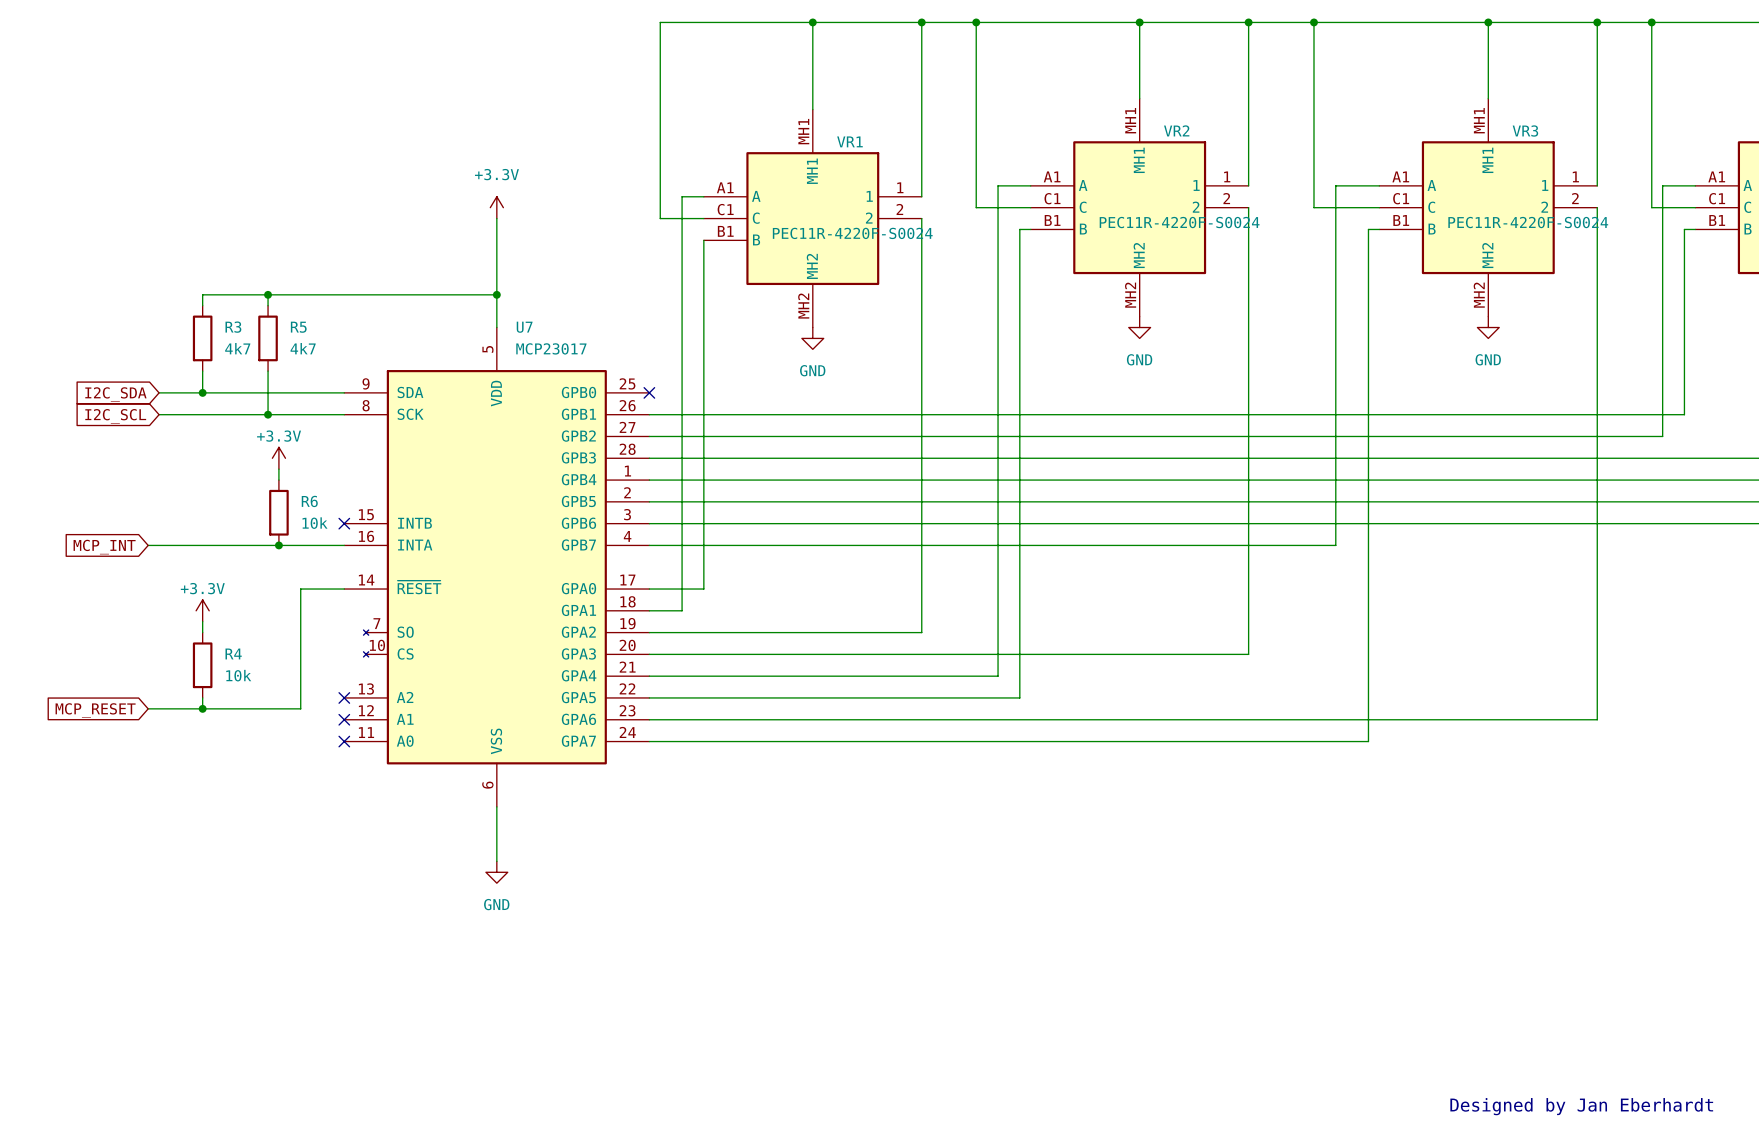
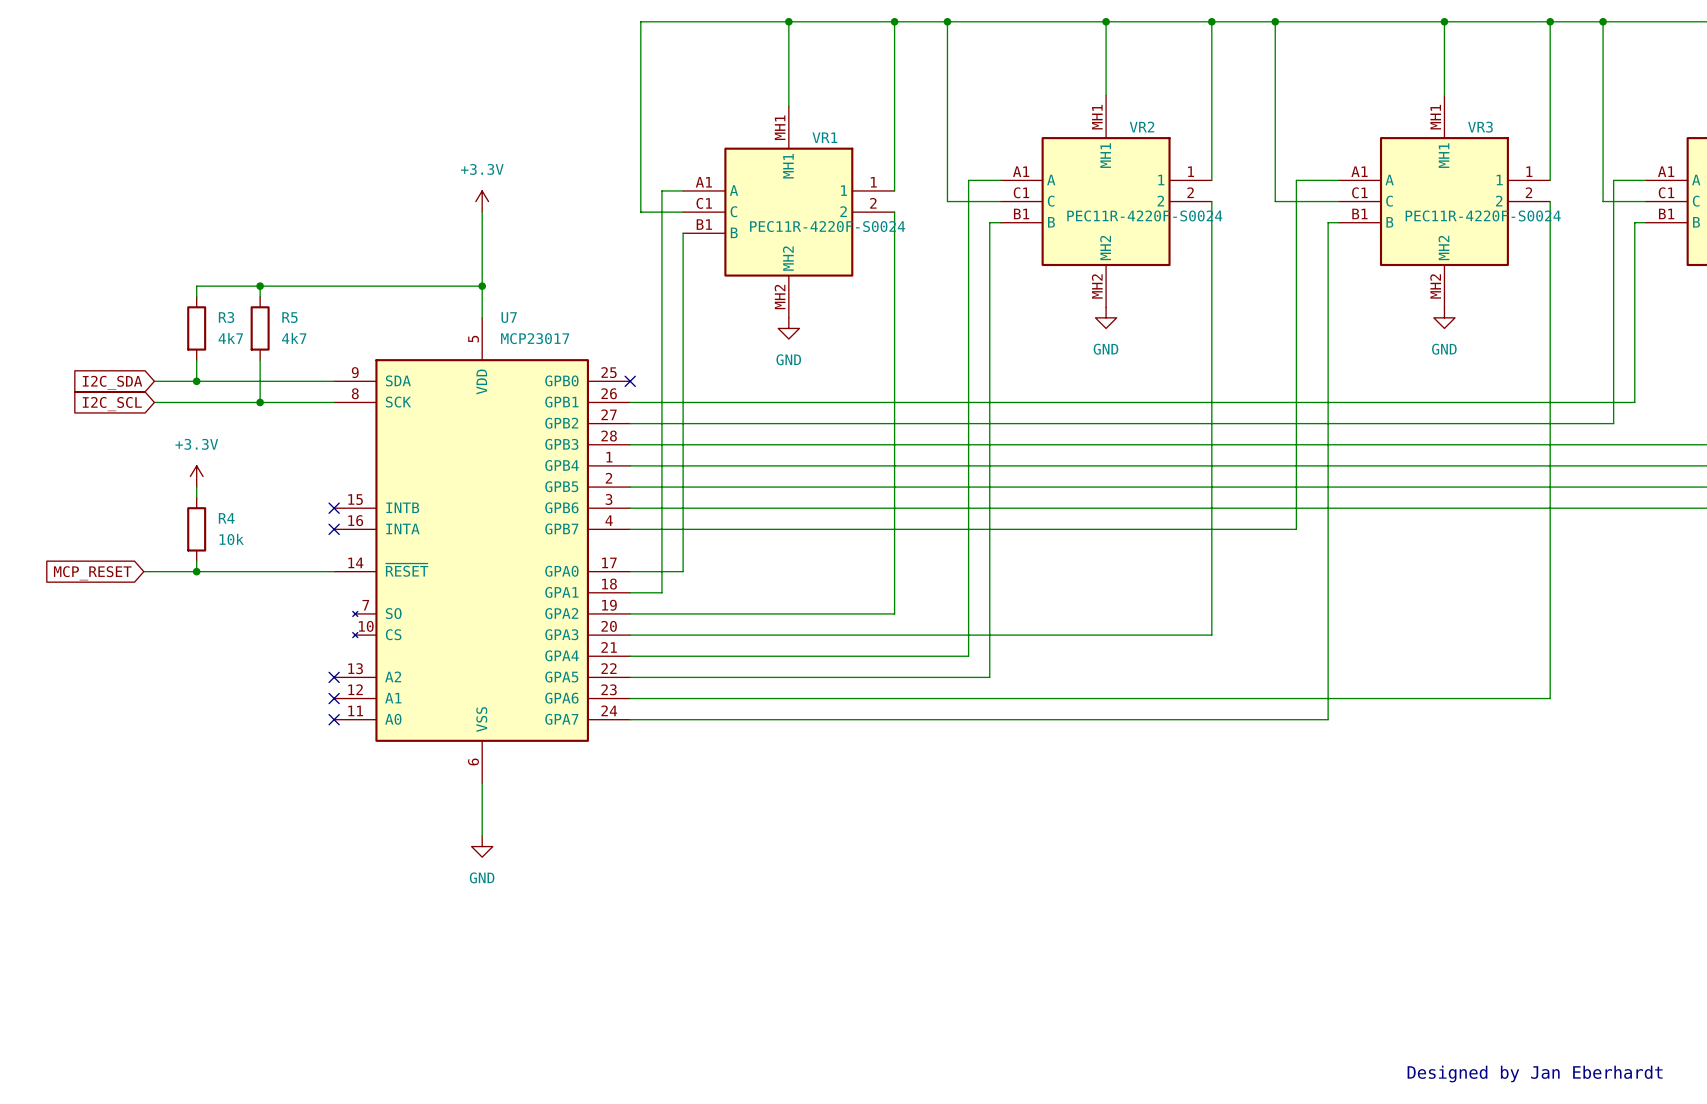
power symbol: +3.3V (278, 458) -> none
wire: (278, 469) (278, 480) -> none
power symbol: none -> +3.3V (196, 476)
R6: 10k (278, 512) -> none
wire: (148, 545) (344, 545) -> none
junction: (278, 545) -> none
no-connect mark: none -> (334, 529)
global label: MCP_INT (104, 547) -> none
junction: none -> (196, 571)
wire: (300, 589) (300, 708) (148, 708) -> (291, 571) (143, 571)
power symbol: +3.3V (202, 610) -> none
wire: (202, 621) (202, 632) -> (196, 487) (196, 497)
R4 position: (202, 665) -> (196, 529)
wire: (202, 697) (202, 708) -> (196, 561) (196, 571)
junction: (202, 708) -> none
global label position: MCP_RESET (95, 710) -> MCP_RESET (92, 573)

